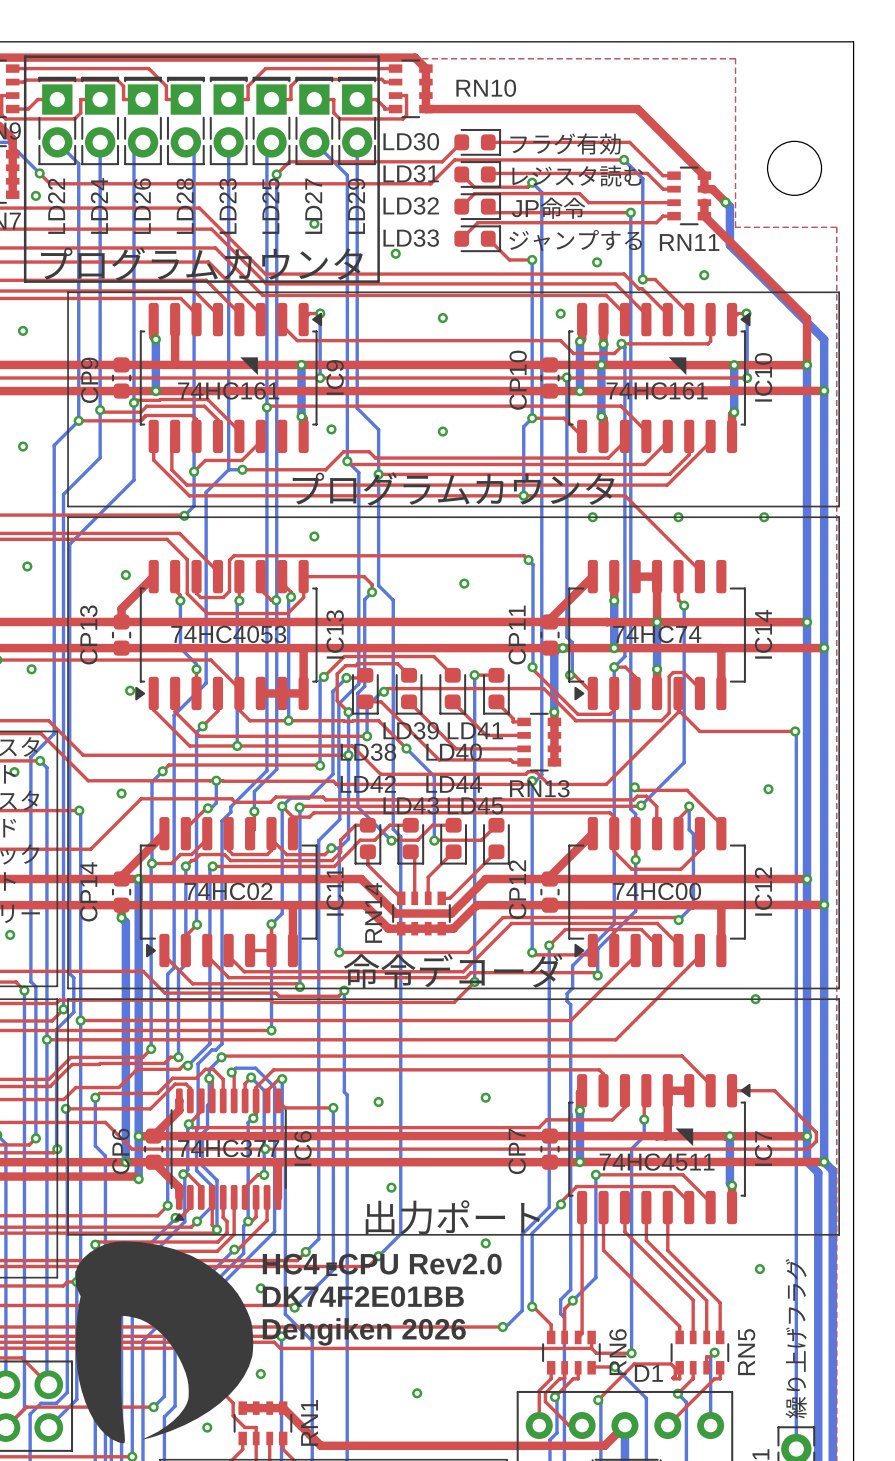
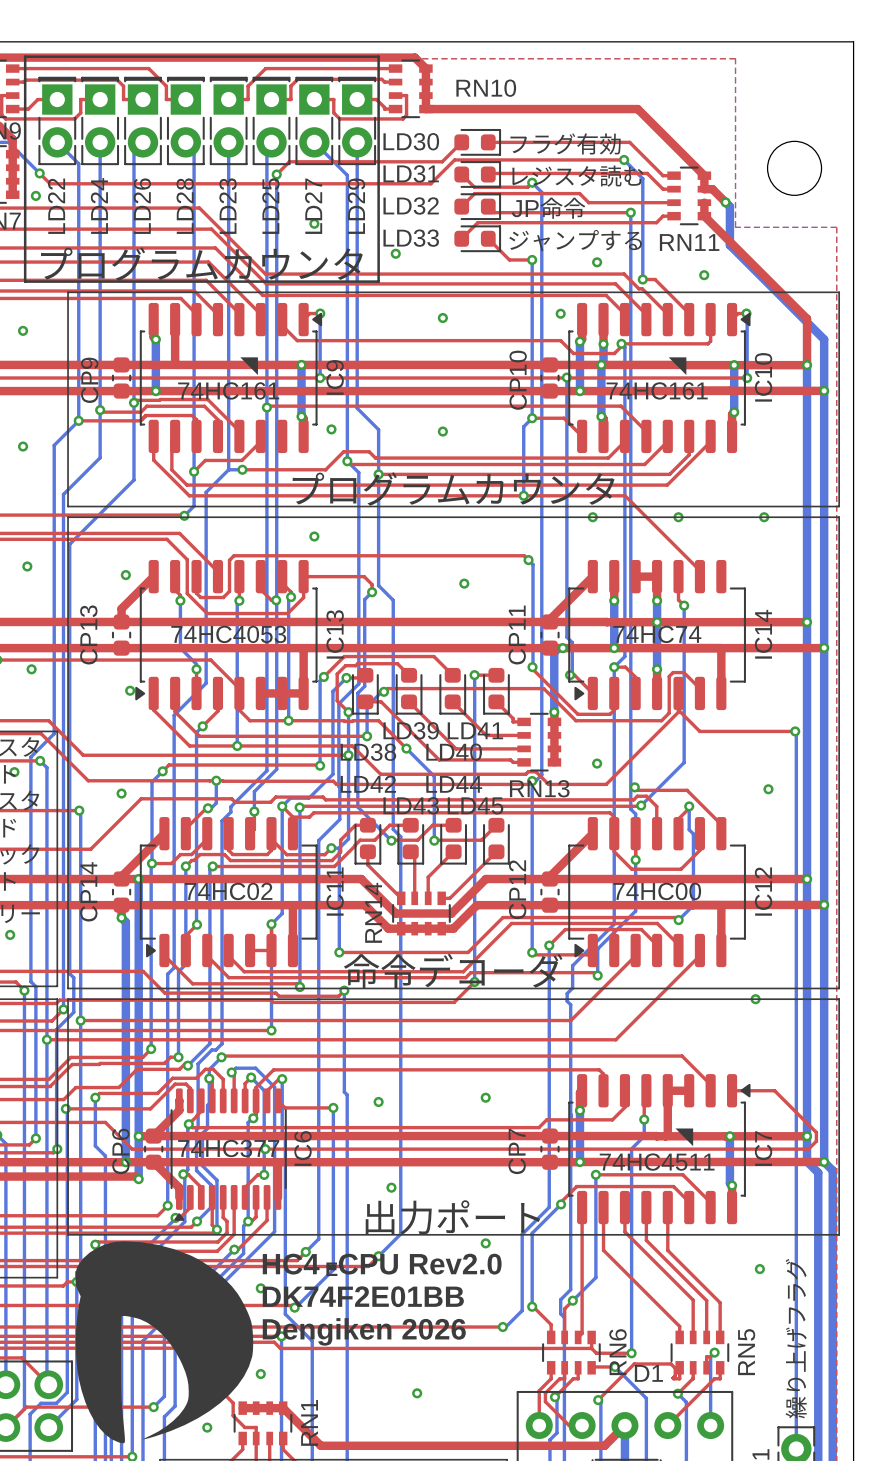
top track: (657, 600) (657, 622) -> none
bottom track: none -> (657, 600) (657, 622)
via: none -> (657, 600)
via: none -> (597, 763)

